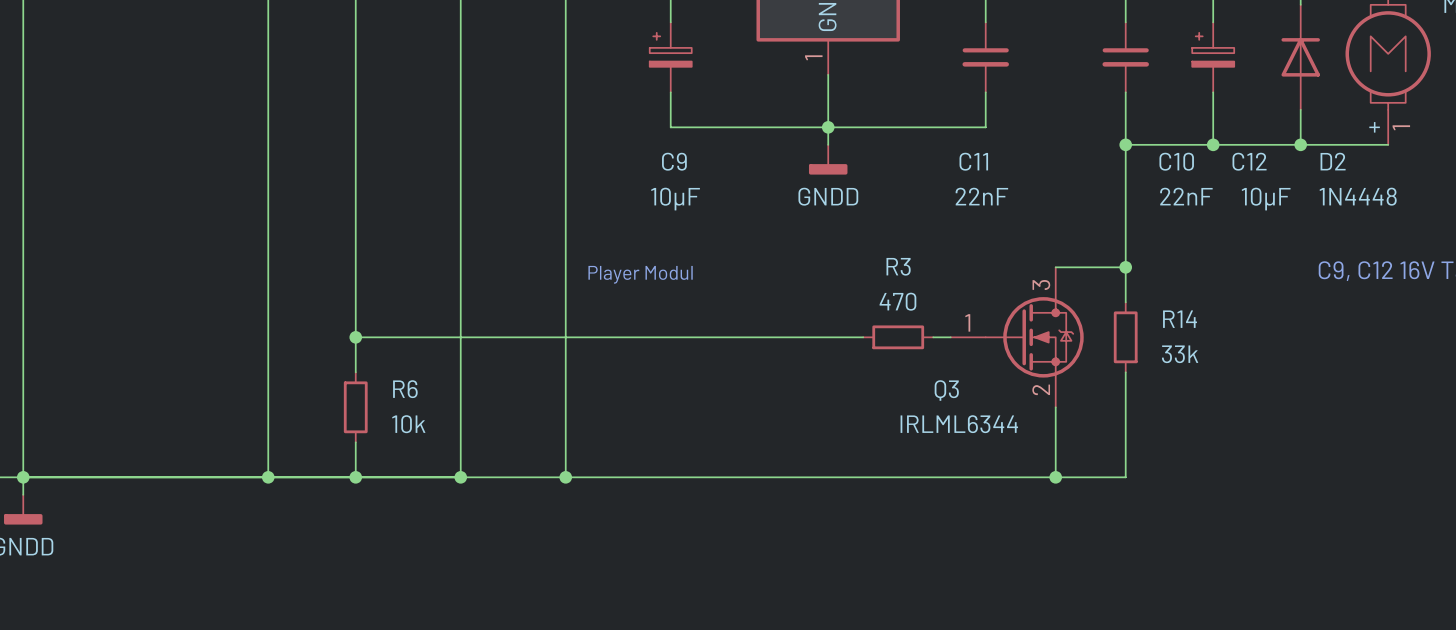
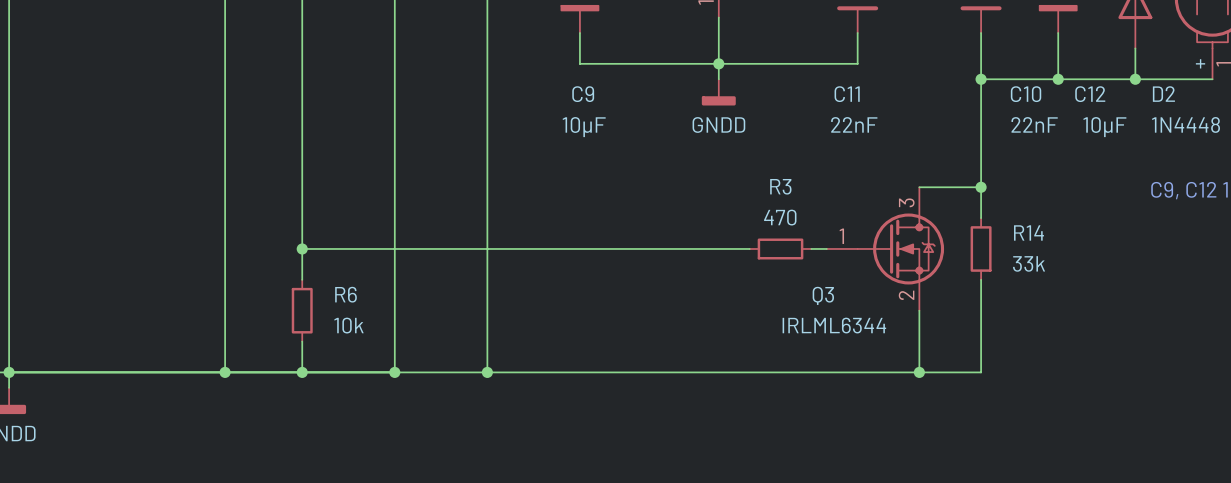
text: Player Modul (640, 274) -> none

